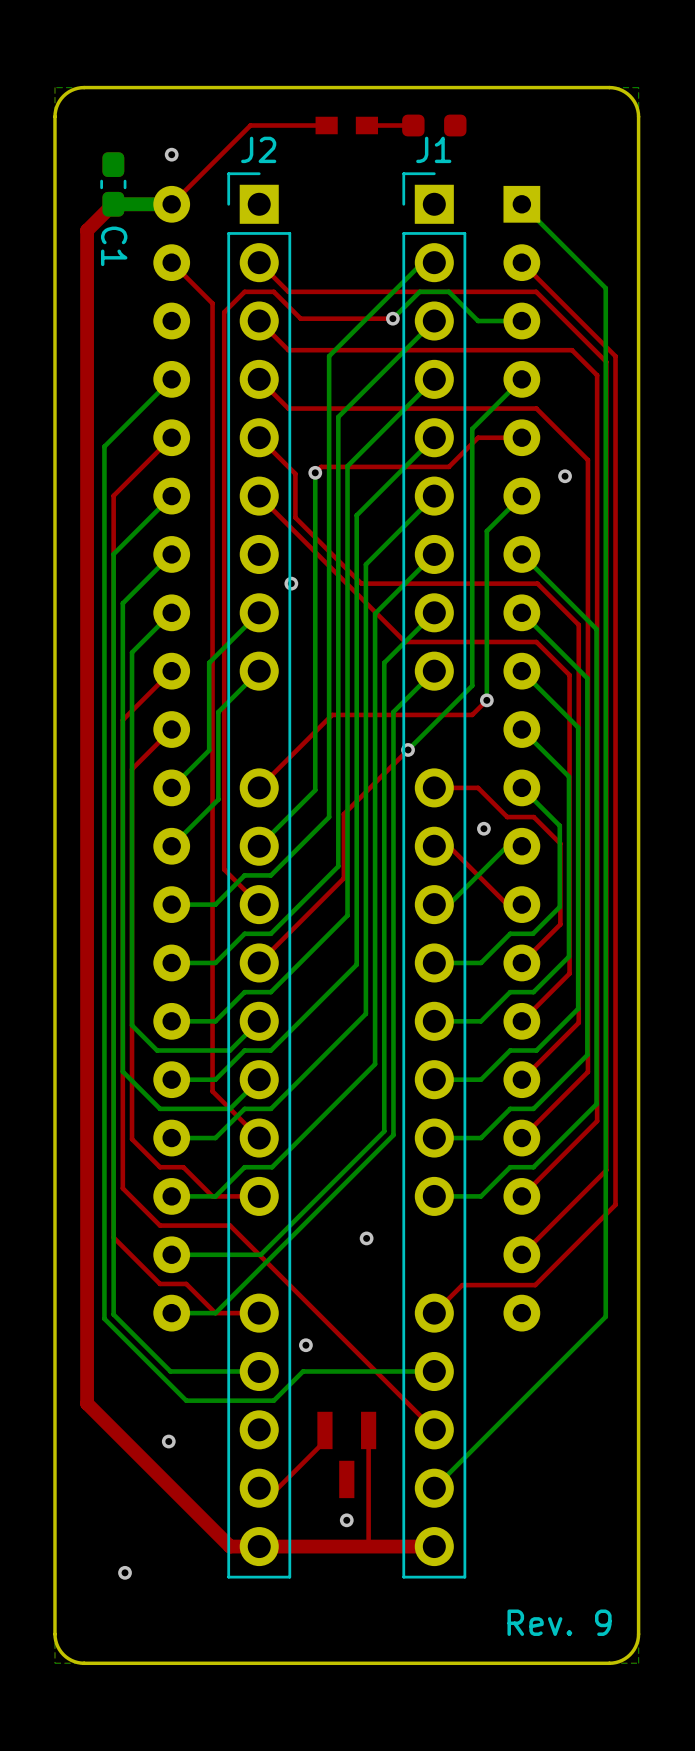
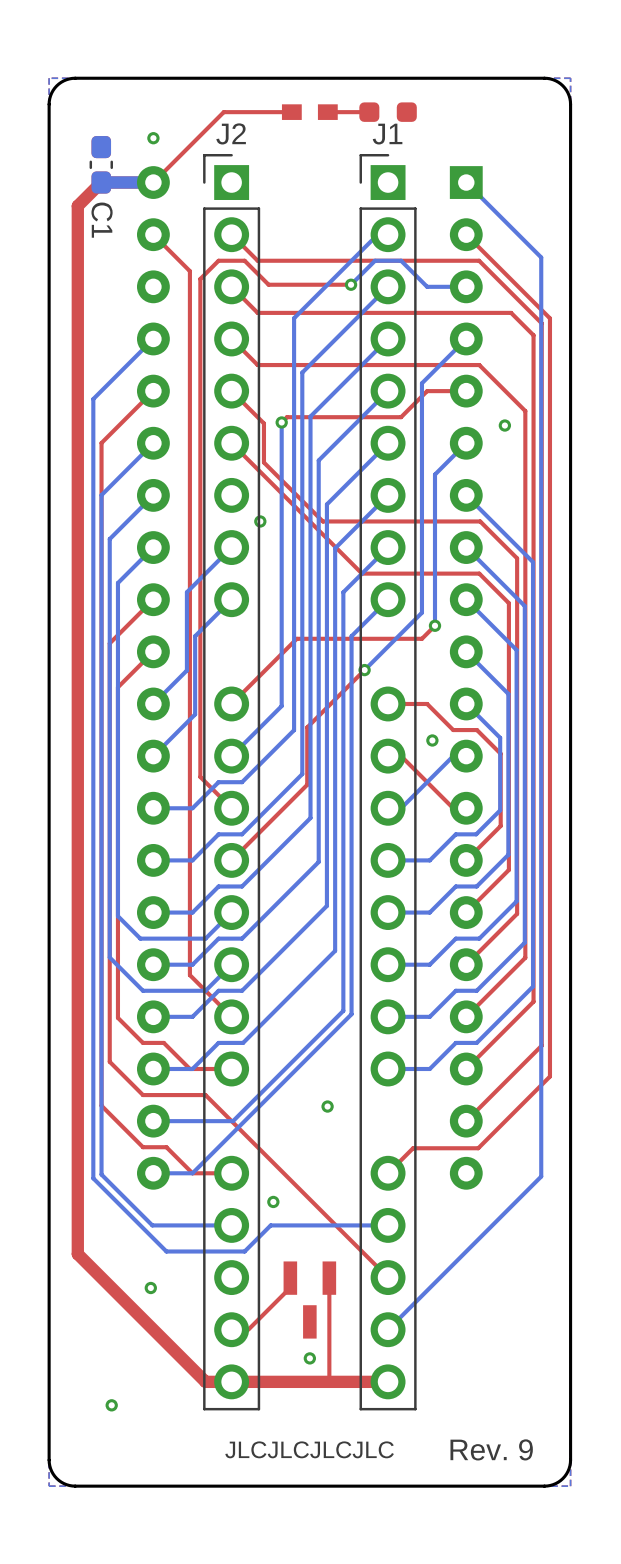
text: none -> JLCJLCJLCJLC (309, 1449)

